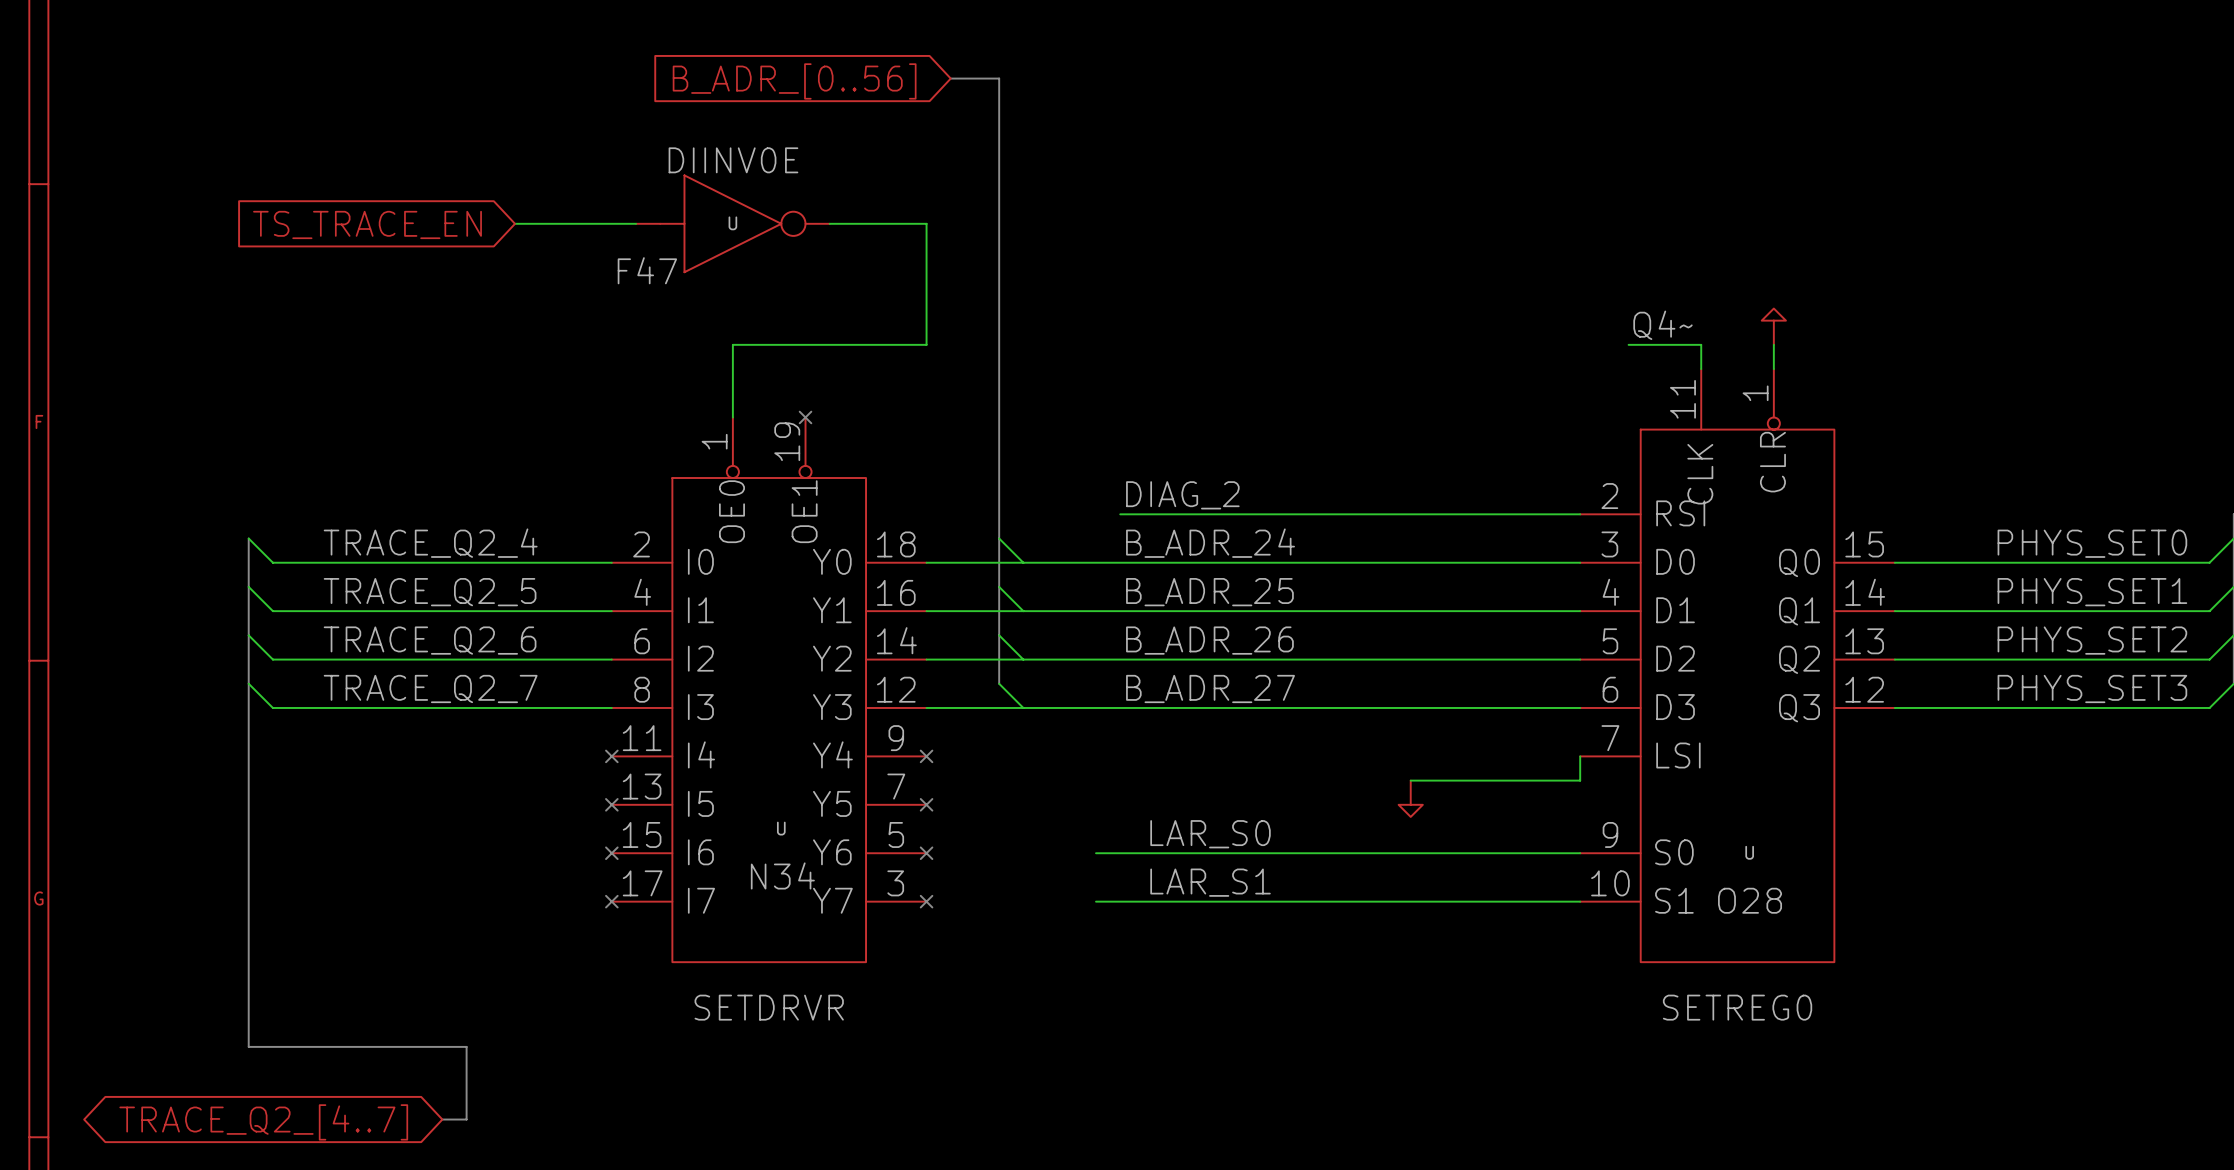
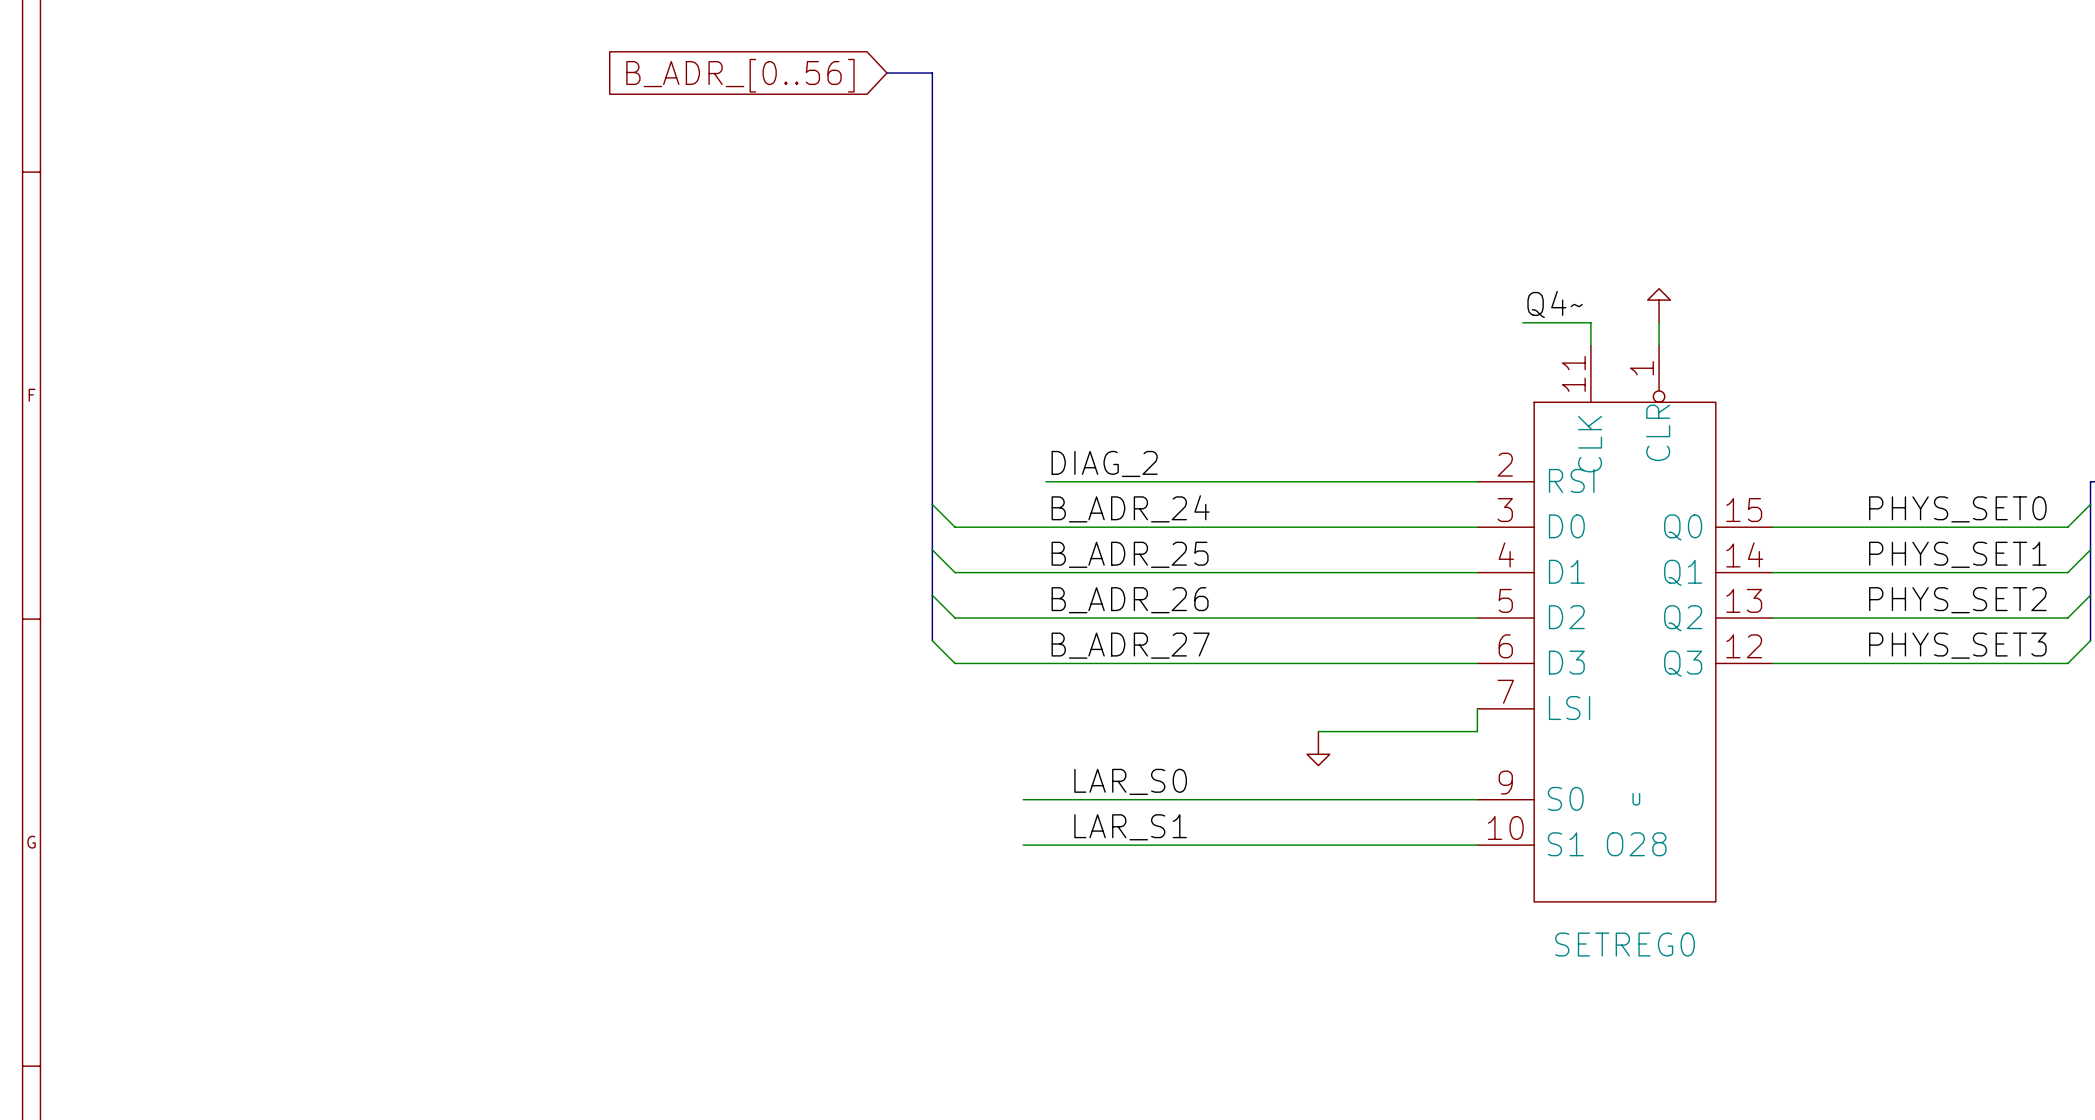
wire: (515, 223) (636, 223) -> none
U: (732, 223) -> none
wire: (829, 223) (926, 223) (926, 344) (732, 344) (732, 417) -> none
global label: TS_TRACE_EN (367, 224) -> none
no-connect mark: (805, 417) -> none
wire: (248, 538) (272, 562) (611, 562) -> none
bus: (248, 538) (248, 1046) (466, 1046) (466, 1119) (442, 1119) -> none
label: TRACE_Q2_4 (430, 543) -> none
wire: (926, 562) (1023, 562) -> none
wire: (248, 586) (272, 611) (611, 611) -> none
label: TRACE_Q2_5 (430, 592) -> none
wire: (926, 611) (1023, 611) -> none
wire: (248, 635) (272, 659) (611, 659) -> none
label: TRACE_Q2_6 (430, 640) -> none
wire: (926, 659) (1023, 659) -> none
wire: (248, 683) (272, 707) (611, 707) -> none
label: TRACE_Q2_7 (430, 688) -> none
U: (769, 689) -> none
wire: (926, 707) (1023, 707) -> none
no-connect mark: (611, 756) -> none
no-connect mark: (926, 756) -> none
no-connect mark: (611, 804) -> none
no-connect mark: (926, 804) -> none
no-connect mark: (611, 853) -> none
no-connect mark: (926, 853) -> none
no-connect mark: (611, 901) -> none
no-connect mark: (926, 901) -> none
global label: TRACE_Q2_[4..7] (263, 1122) -> none

